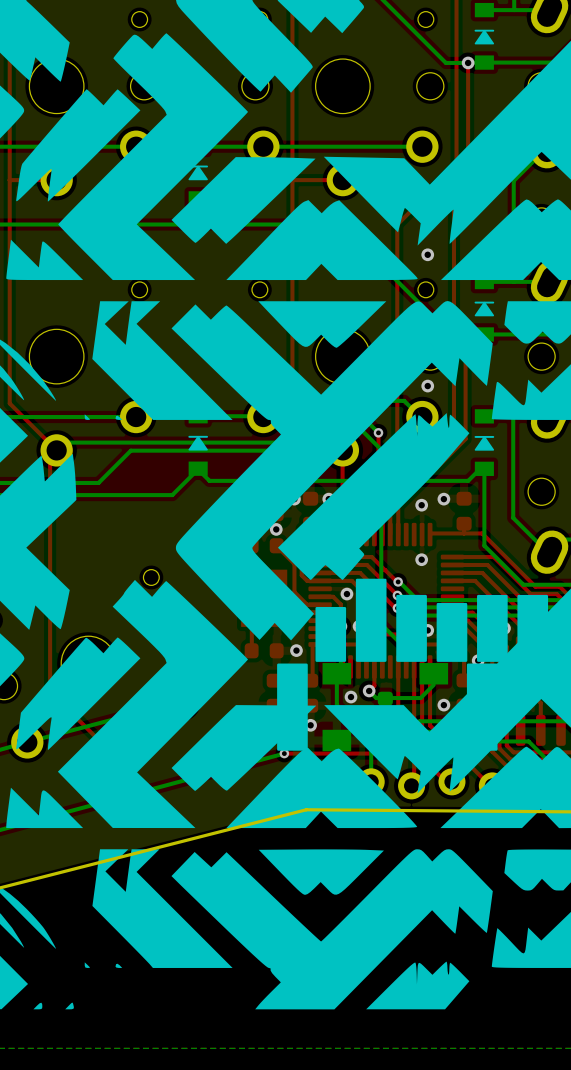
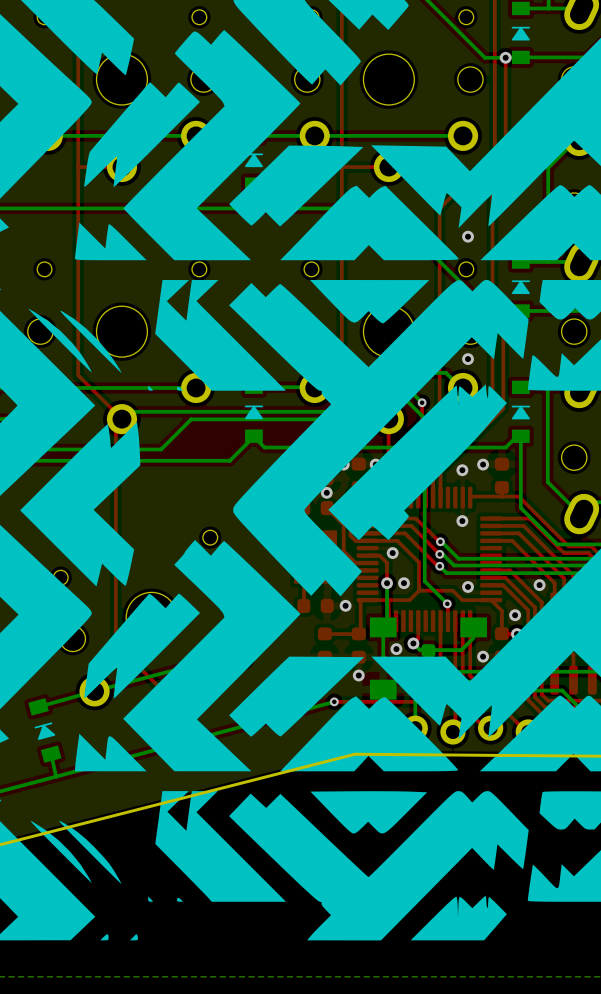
drawing: [277, 578, 549, 751] -> none

